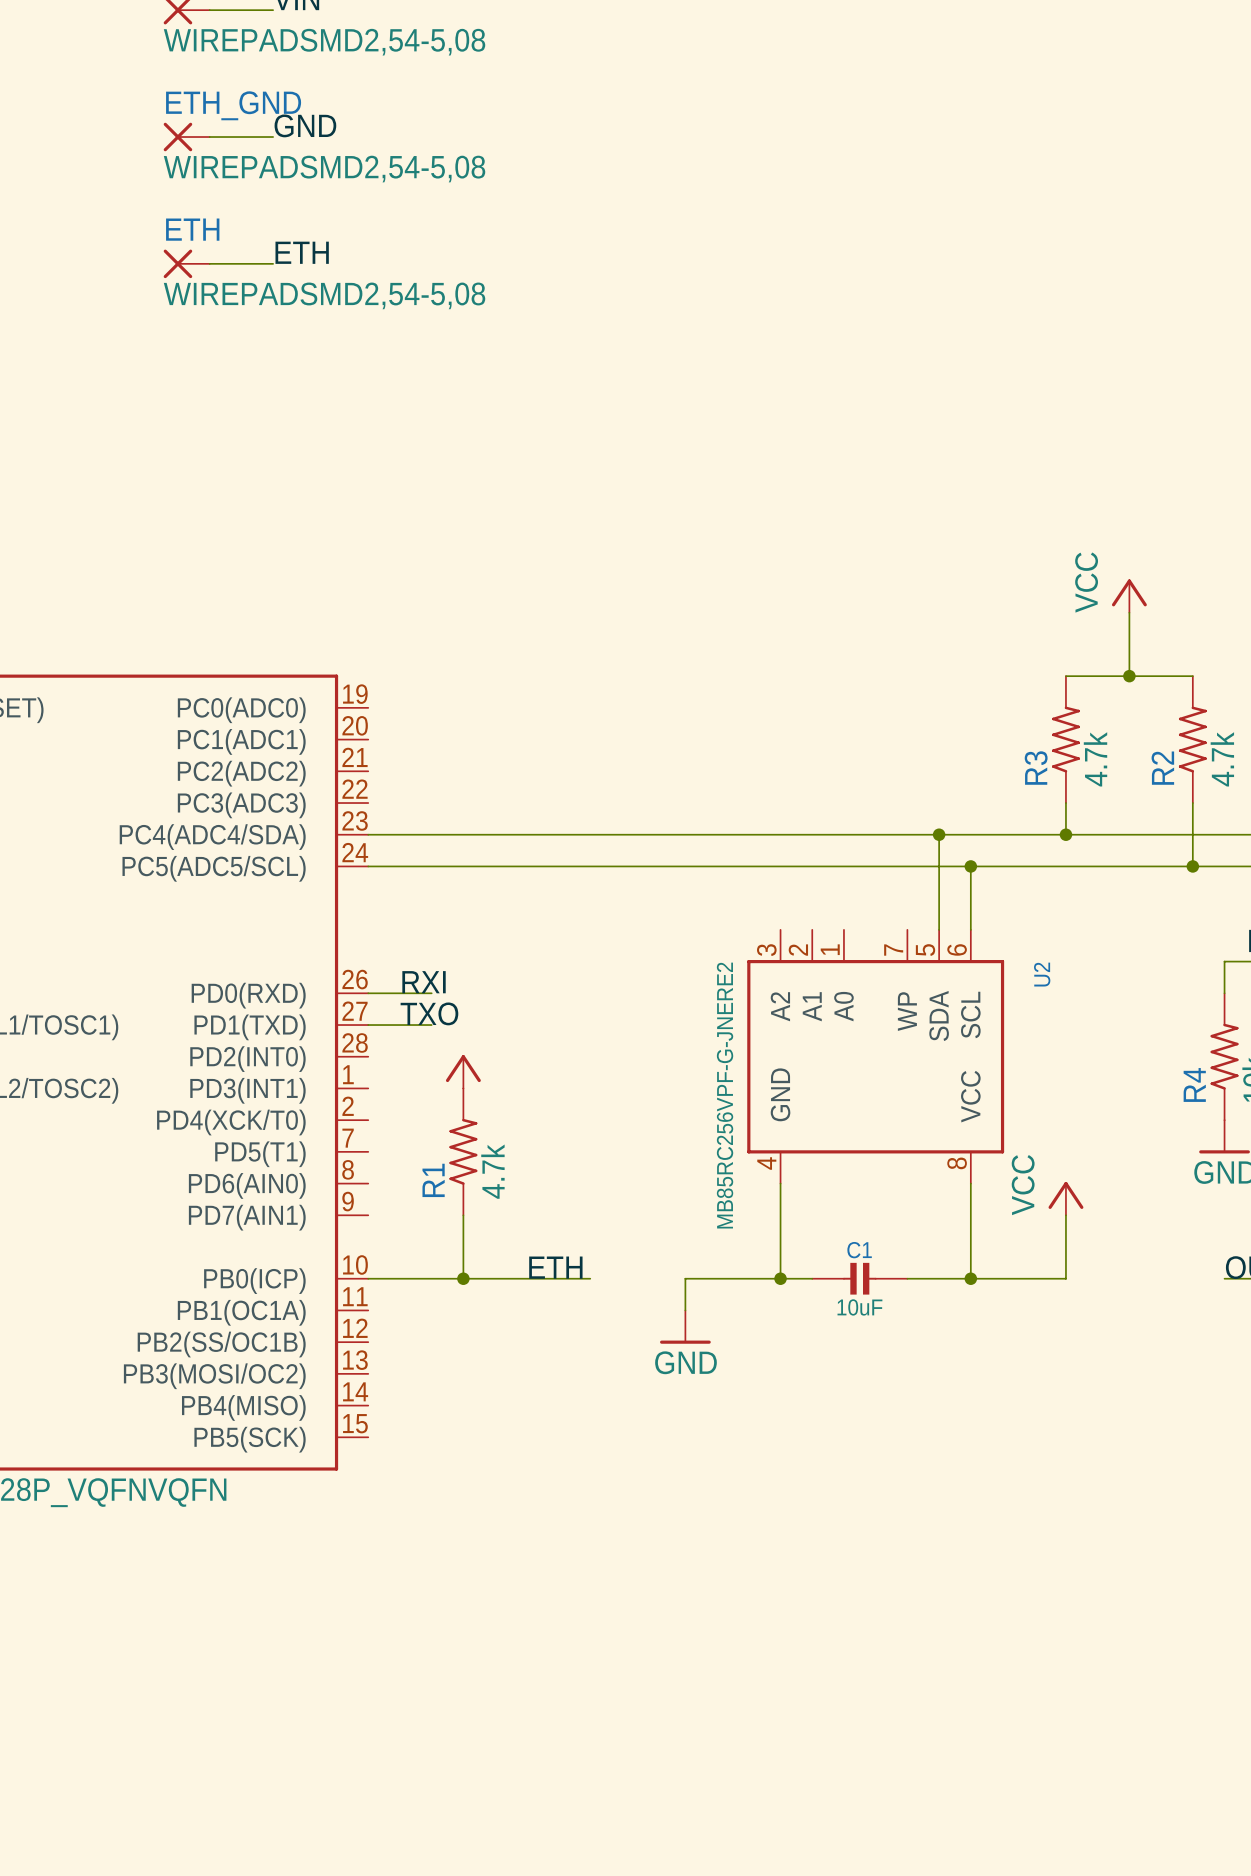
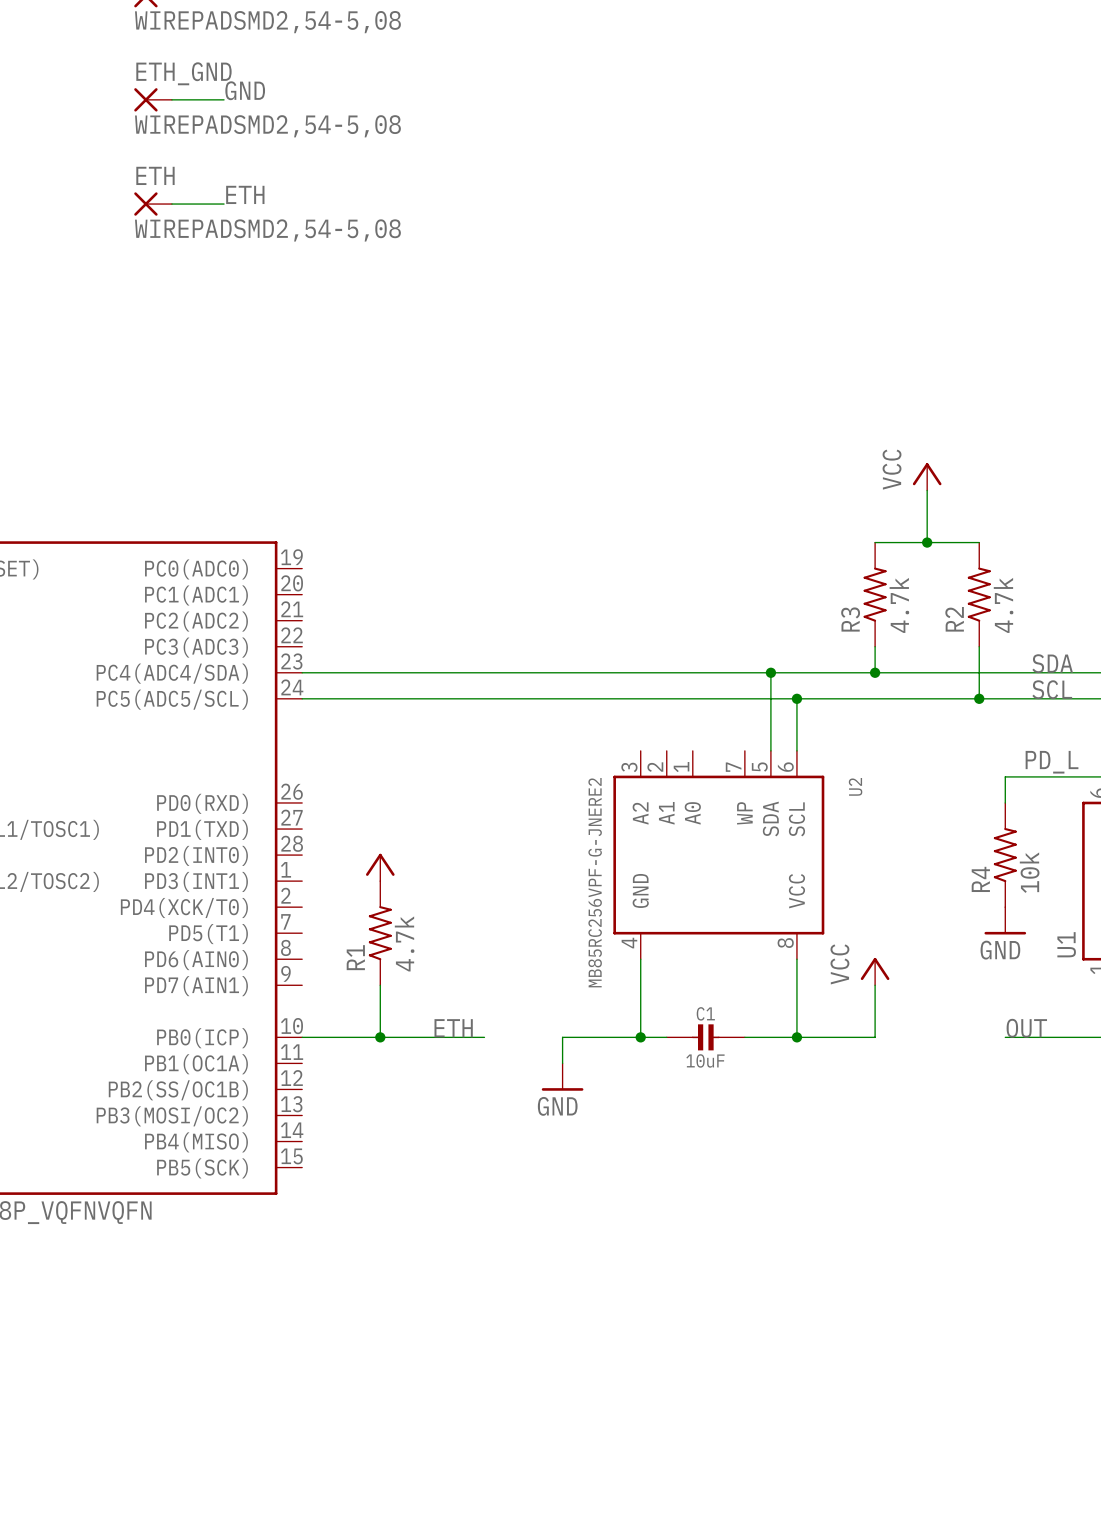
label: RXI (424, 982) -> none
wire: (368, 993) (431, 993) -> none
label: TXO (429, 1013) -> none
wire: (368, 1025) (431, 1025) -> none

